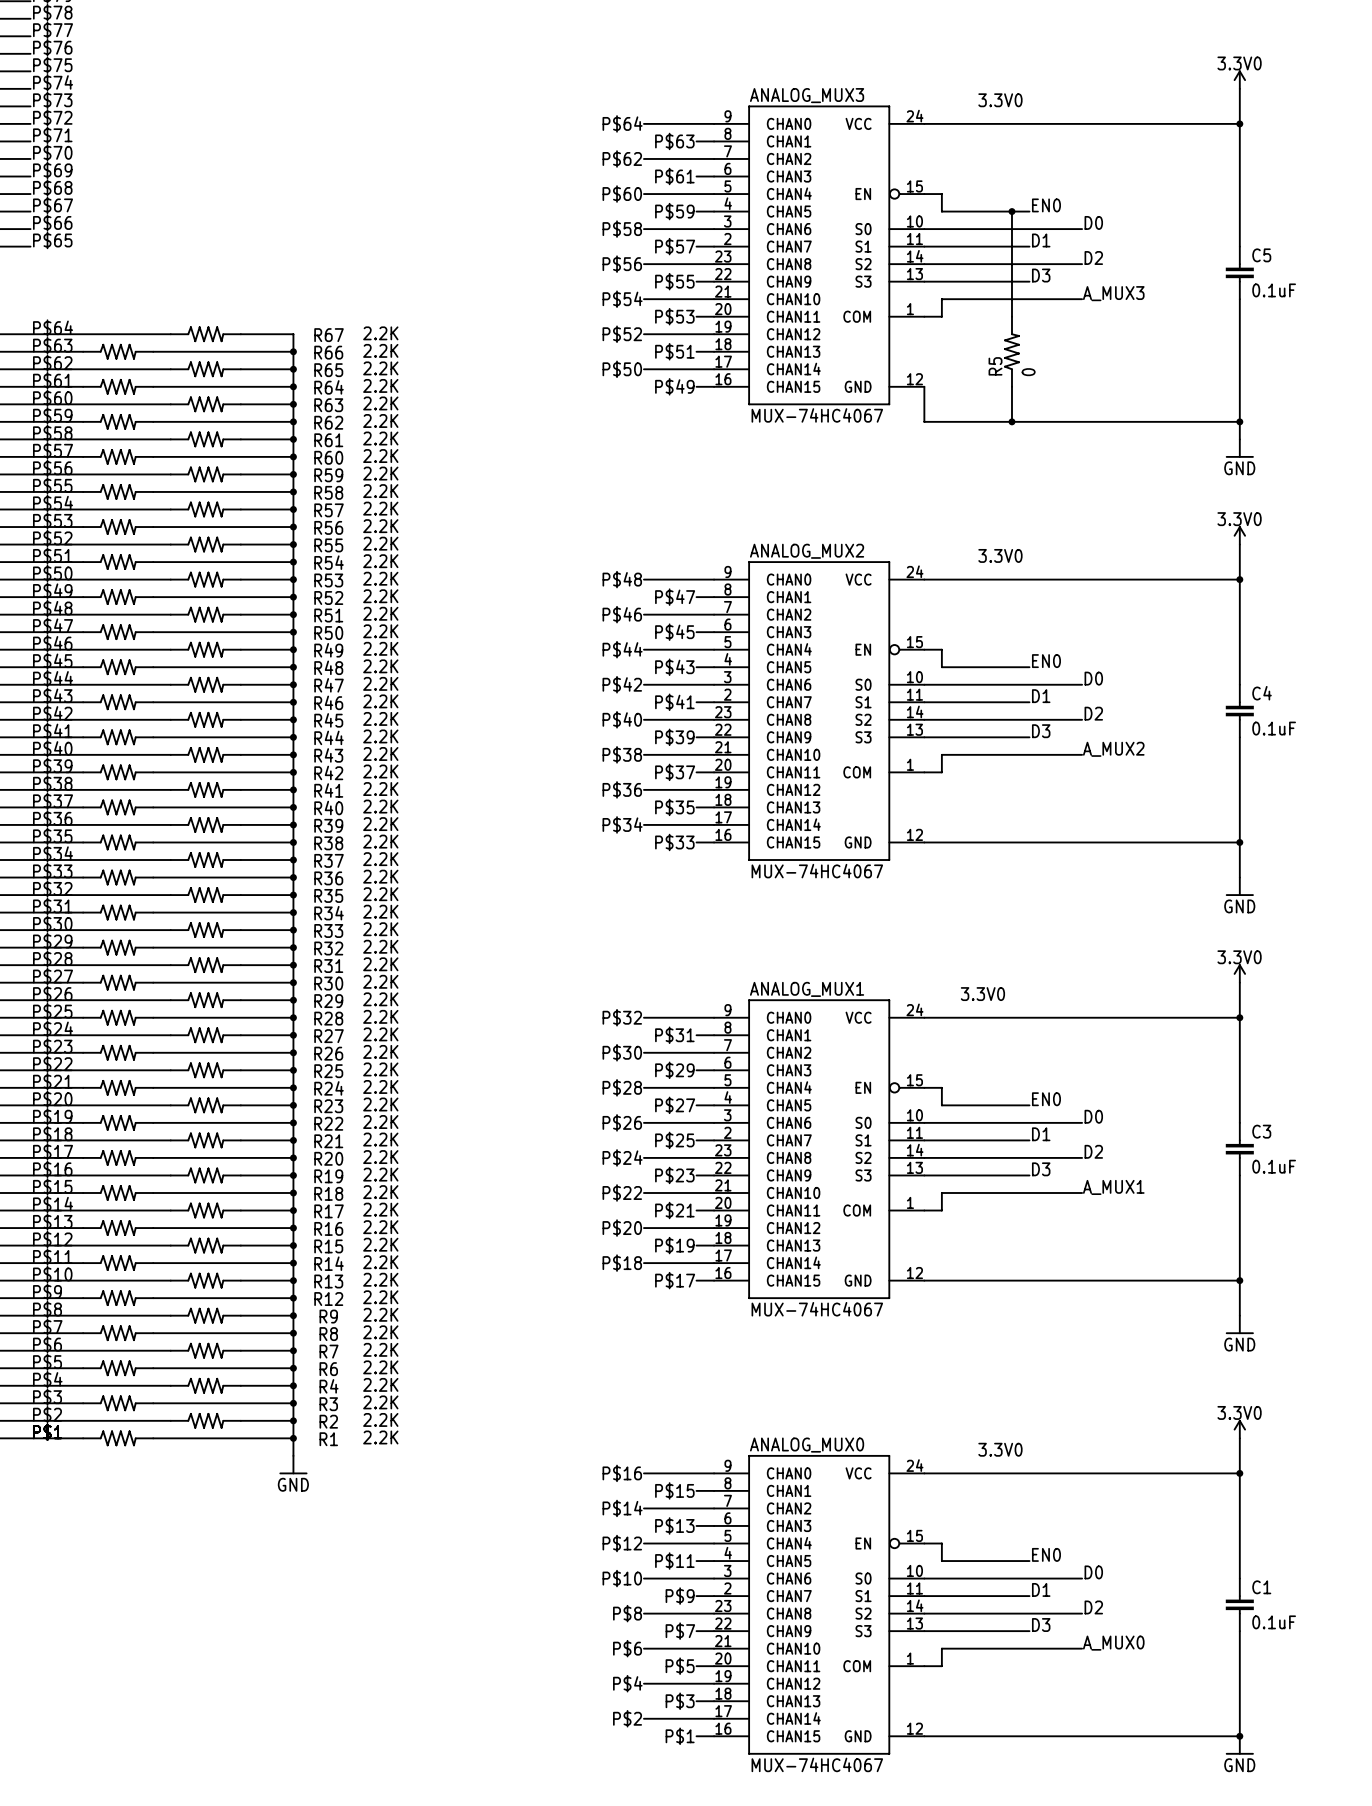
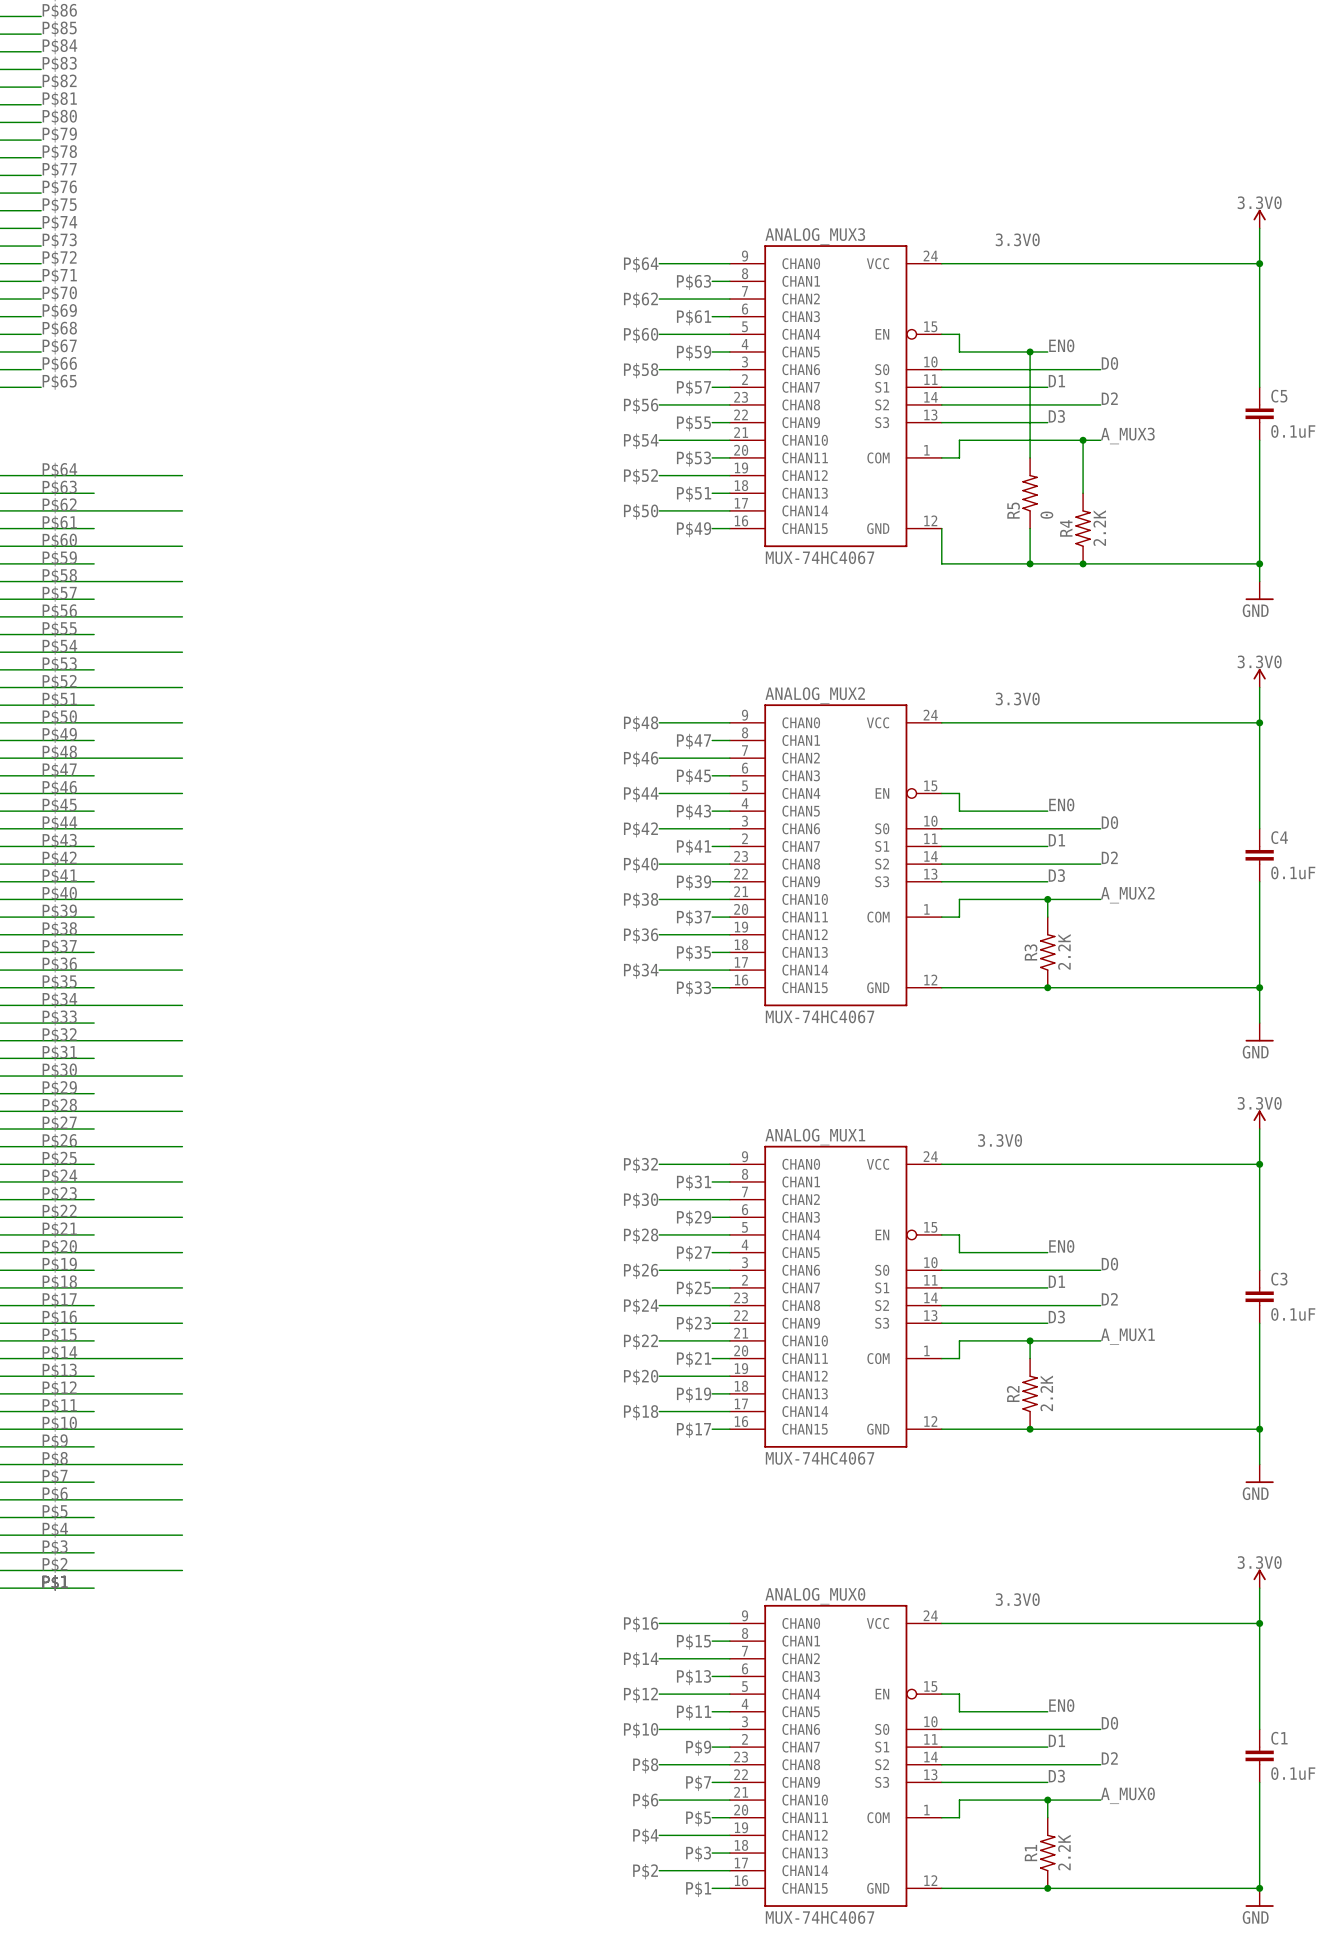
wire: none -> (1083, 440) (1083, 493)
junction: none -> (1083, 440)
R67: 2.2K (205, 334) -> none
wire: (240, 334) (293, 334) (293, 1455) -> none
R66: 2.2K (118, 351) -> none
wire: (153, 351) (293, 351) -> none
junction: (293, 351) -> none
R65: 2.2K (205, 369) -> none
wire: (240, 369) (293, 369) -> none
junction: (293, 369) -> none
R64: 2.2K (118, 386) -> none
wire: (153, 386) (293, 386) -> none
junction: (293, 386) -> none
R63: 2.2K (205, 404) -> none
wire: (240, 404) (293, 404) -> none
junction: (293, 404) -> none
R62: 2.2K (118, 421) -> none
wire: (153, 421) (293, 421) -> none
junction: (293, 421) -> none
junction: none -> (1083, 563)
R61: 2.2K (205, 439) -> none
wire: (240, 439) (293, 439) -> none
junction: (293, 439) -> none
R60: 2.2K (118, 456) -> none
wire: (153, 456) (293, 456) -> none
junction: (293, 456) -> none
R59: 2.2K (205, 474) -> none
wire: (240, 474) (293, 474) -> none
junction: (293, 474) -> none
R58: 2.2K (118, 491) -> none
wire: (153, 491) (293, 491) -> none
junction: (293, 491) -> none
R57: 2.2K (205, 509) -> none
wire: (240, 509) (293, 509) -> none
junction: (293, 509) -> none
R56: 2.2K (118, 527) -> none
wire: (153, 527) (293, 527) -> none
junction: (293, 527) -> none
R55: 2.2K (205, 544) -> none
wire: (240, 544) (293, 544) -> none
junction: (293, 544) -> none
R54: 2.2K (118, 562) -> none
wire: (153, 562) (293, 562) -> none
junction: (293, 562) -> none
R53: 2.2K (205, 579) -> none
wire: (240, 579) (293, 579) -> none
junction: (293, 579) -> none
R52: 2.2K (118, 597) -> none
wire: (153, 597) (293, 597) -> none
junction: (293, 597) -> none
R51: 2.2K (205, 614) -> none
wire: (240, 614) (293, 614) -> none
junction: (293, 614) -> none
R50: 2.2K (118, 632) -> none
wire: (153, 632) (293, 632) -> none
junction: (293, 632) -> none
R49: 2.2K (205, 649) -> none
wire: (240, 649) (293, 649) -> none
junction: (293, 649) -> none
R48: 2.2K (118, 667) -> none
wire: (153, 667) (293, 667) -> none
junction: (293, 667) -> none
R47: 2.2K (205, 684) -> none
wire: (240, 684) (293, 684) -> none
junction: (293, 684) -> none
R46: 2.2K (118, 702) -> none
wire: (153, 702) (293, 702) -> none
junction: (293, 702) -> none
R45: 2.2K (205, 719) -> none
wire: (240, 719) (293, 719) -> none
junction: (293, 719) -> none
R44: 2.2K (118, 737) -> none
wire: (153, 737) (293, 737) -> none
junction: (293, 737) -> none
R43: 2.2K (205, 754) -> none
wire: (240, 754) (293, 754) -> none
junction: (293, 754) -> none
wire: none -> (1047, 899) (1047, 917)
junction: none -> (1047, 899)
R42: 2.2K (118, 772) -> none
wire: (153, 772) (293, 772) -> none
junction: (293, 772) -> none
R41: 2.2K (205, 789) -> none
wire: (240, 789) (293, 789) -> none
junction: (293, 789) -> none
R40: 2.2K (118, 807) -> none
wire: (153, 807) (293, 807) -> none
junction: (293, 807) -> none
R39: 2.2K (205, 824) -> none
wire: (240, 824) (293, 824) -> none
junction: (293, 824) -> none
R38: 2.2K (118, 842) -> none
wire: (153, 842) (293, 842) -> none
junction: (293, 842) -> none
junction: none -> (1047, 987)
R37: 2.2K (205, 860) -> none
wire: (240, 860) (293, 860) -> none
junction: (293, 860) -> none
R36: 2.2K (118, 877) -> none
wire: (153, 877) (293, 877) -> none
junction: (293, 877) -> none
R35: 2.2K (205, 895) -> none
wire: (240, 895) (293, 895) -> none
junction: (293, 895) -> none
R34: 2.2K (118, 912) -> none
wire: (153, 912) (293, 912) -> none
junction: (293, 912) -> none
R33: 2.2K (205, 930) -> none
wire: (240, 930) (293, 930) -> none
junction: (293, 930) -> none
R32: 2.2K (118, 947) -> none
wire: (153, 947) (293, 947) -> none
junction: (293, 947) -> none
R31: 2.2K (205, 965) -> none
wire: (240, 965) (293, 965) -> none
junction: (293, 965) -> none
R30: 2.2K (118, 982) -> none
wire: (153, 982) (293, 982) -> none
junction: (293, 982) -> none
R29: 2.2K (205, 1000) -> none
wire: (240, 1000) (293, 1000) -> none
junction: (293, 1000) -> none
R28: 2.2K (118, 1017) -> none
wire: (153, 1017) (293, 1017) -> none
junction: (293, 1017) -> none
R27: 2.2K (205, 1035) -> none
wire: (240, 1035) (293, 1035) -> none
junction: (293, 1035) -> none
R26: 2.2K (118, 1052) -> none
wire: (153, 1052) (293, 1052) -> none
junction: (293, 1052) -> none
R25: 2.2K (205, 1070) -> none
wire: (240, 1070) (293, 1070) -> none
junction: (293, 1070) -> none
R24: 2.2K (118, 1087) -> none
wire: (153, 1087) (293, 1087) -> none
junction: (293, 1087) -> none
R23: 2.2K (205, 1105) -> none
wire: (240, 1105) (293, 1105) -> none
junction: (293, 1105) -> none
R22: 2.2K (118, 1122) -> none
wire: (153, 1122) (293, 1122) -> none
junction: (293, 1122) -> none
R21: 2.2K (205, 1140) -> none
wire: (240, 1140) (293, 1140) -> none
junction: (293, 1140) -> none
R20: 2.2K (118, 1157) -> none
wire: (153, 1157) (293, 1157) -> none
junction: (293, 1157) -> none
R19: 2.2K (205, 1175) -> none
wire: (240, 1175) (293, 1175) -> none
junction: (293, 1175) -> none
R18: 2.2K (118, 1192) -> none
wire: (153, 1192) (293, 1192) -> none
junction: (293, 1192) -> none
wire: none -> (1030, 1340) (1030, 1358)
junction: none -> (1030, 1340)
R17: 2.2K (205, 1210) -> none
wire: (240, 1210) (293, 1210) -> none
junction: (293, 1210) -> none
R16: 2.2K (118, 1228) -> none
wire: (153, 1228) (293, 1228) -> none
junction: (293, 1228) -> none
R15: 2.2K (205, 1245) -> none
wire: (240, 1245) (293, 1245) -> none
junction: (293, 1245) -> none
R14: 2.2K (118, 1263) -> none
wire: (153, 1263) (293, 1263) -> none
junction: (293, 1263) -> none
R13: 2.2K (205, 1280) -> none
wire: (240, 1280) (293, 1280) -> none
junction: (293, 1280) -> none
junction: none -> (1030, 1429)
R12: 2.2K (118, 1298) -> none
wire: (153, 1298) (293, 1298) -> none
junction: (293, 1298) -> none
R9: 2.2K (205, 1315) -> none
wire: (240, 1315) (293, 1315) -> none
junction: (293, 1315) -> none
R8: 2.2K (118, 1333) -> none
wire: (153, 1333) (293, 1333) -> none
junction: (293, 1333) -> none
R7: 2.2K (205, 1350) -> none
wire: (240, 1350) (293, 1350) -> none
junction: (293, 1350) -> none
R6: 2.2K (118, 1368) -> none
wire: (153, 1368) (293, 1368) -> none
junction: (293, 1368) -> none
R4 value position: 2.2K (380, 1384) -> 2.2K (1099, 528)
R4 rotation: 0° (205, 1385) -> 90° counterclockwise (1083, 528)
R4 position: (205, 1385) -> (1083, 528)
wire: (240, 1385) (293, 1385) -> none
junction: (293, 1385) -> none
R4 name position: R4 (329, 1386) -> R4 (1066, 528)
R3 value position: 2.2K (380, 1402) -> 2.2K (1064, 951)
R3 rotation: 0° (118, 1403) -> 90° counterclockwise (1047, 952)
R3 position: (118, 1403) -> (1047, 952)
wire: (153, 1403) (293, 1403) -> none
junction: (293, 1403) -> none
R3 name position: R3 (328, 1404) -> R3 (1030, 952)
R2 value position: 2.2K (380, 1419) -> 2.2K (1046, 1393)
R2 rotation: 0° (205, 1420) -> 90° counterclockwise (1030, 1393)
R2 position: (205, 1420) -> (1030, 1393)
wire: (240, 1420) (293, 1420) -> none
junction: (293, 1420) -> none
R2 name position: R2 (328, 1421) -> R2 (1013, 1394)
R1 value position: 2.2K (380, 1437) -> 2.2K (1064, 1852)
R1 rotation: 0° (118, 1438) -> 90° counterclockwise (1047, 1853)
R1 position: (118, 1438) -> (1047, 1853)
wire: (153, 1438) (293, 1438) -> none
junction: (293, 1438) -> none
R1 name position: R1 (328, 1439) -> R1 (1030, 1853)
power symbol: GND (293, 1465) -> none
wire: none -> (1047, 1800) (1047, 1817)
junction: none -> (1047, 1800)
junction: none -> (1047, 1888)

